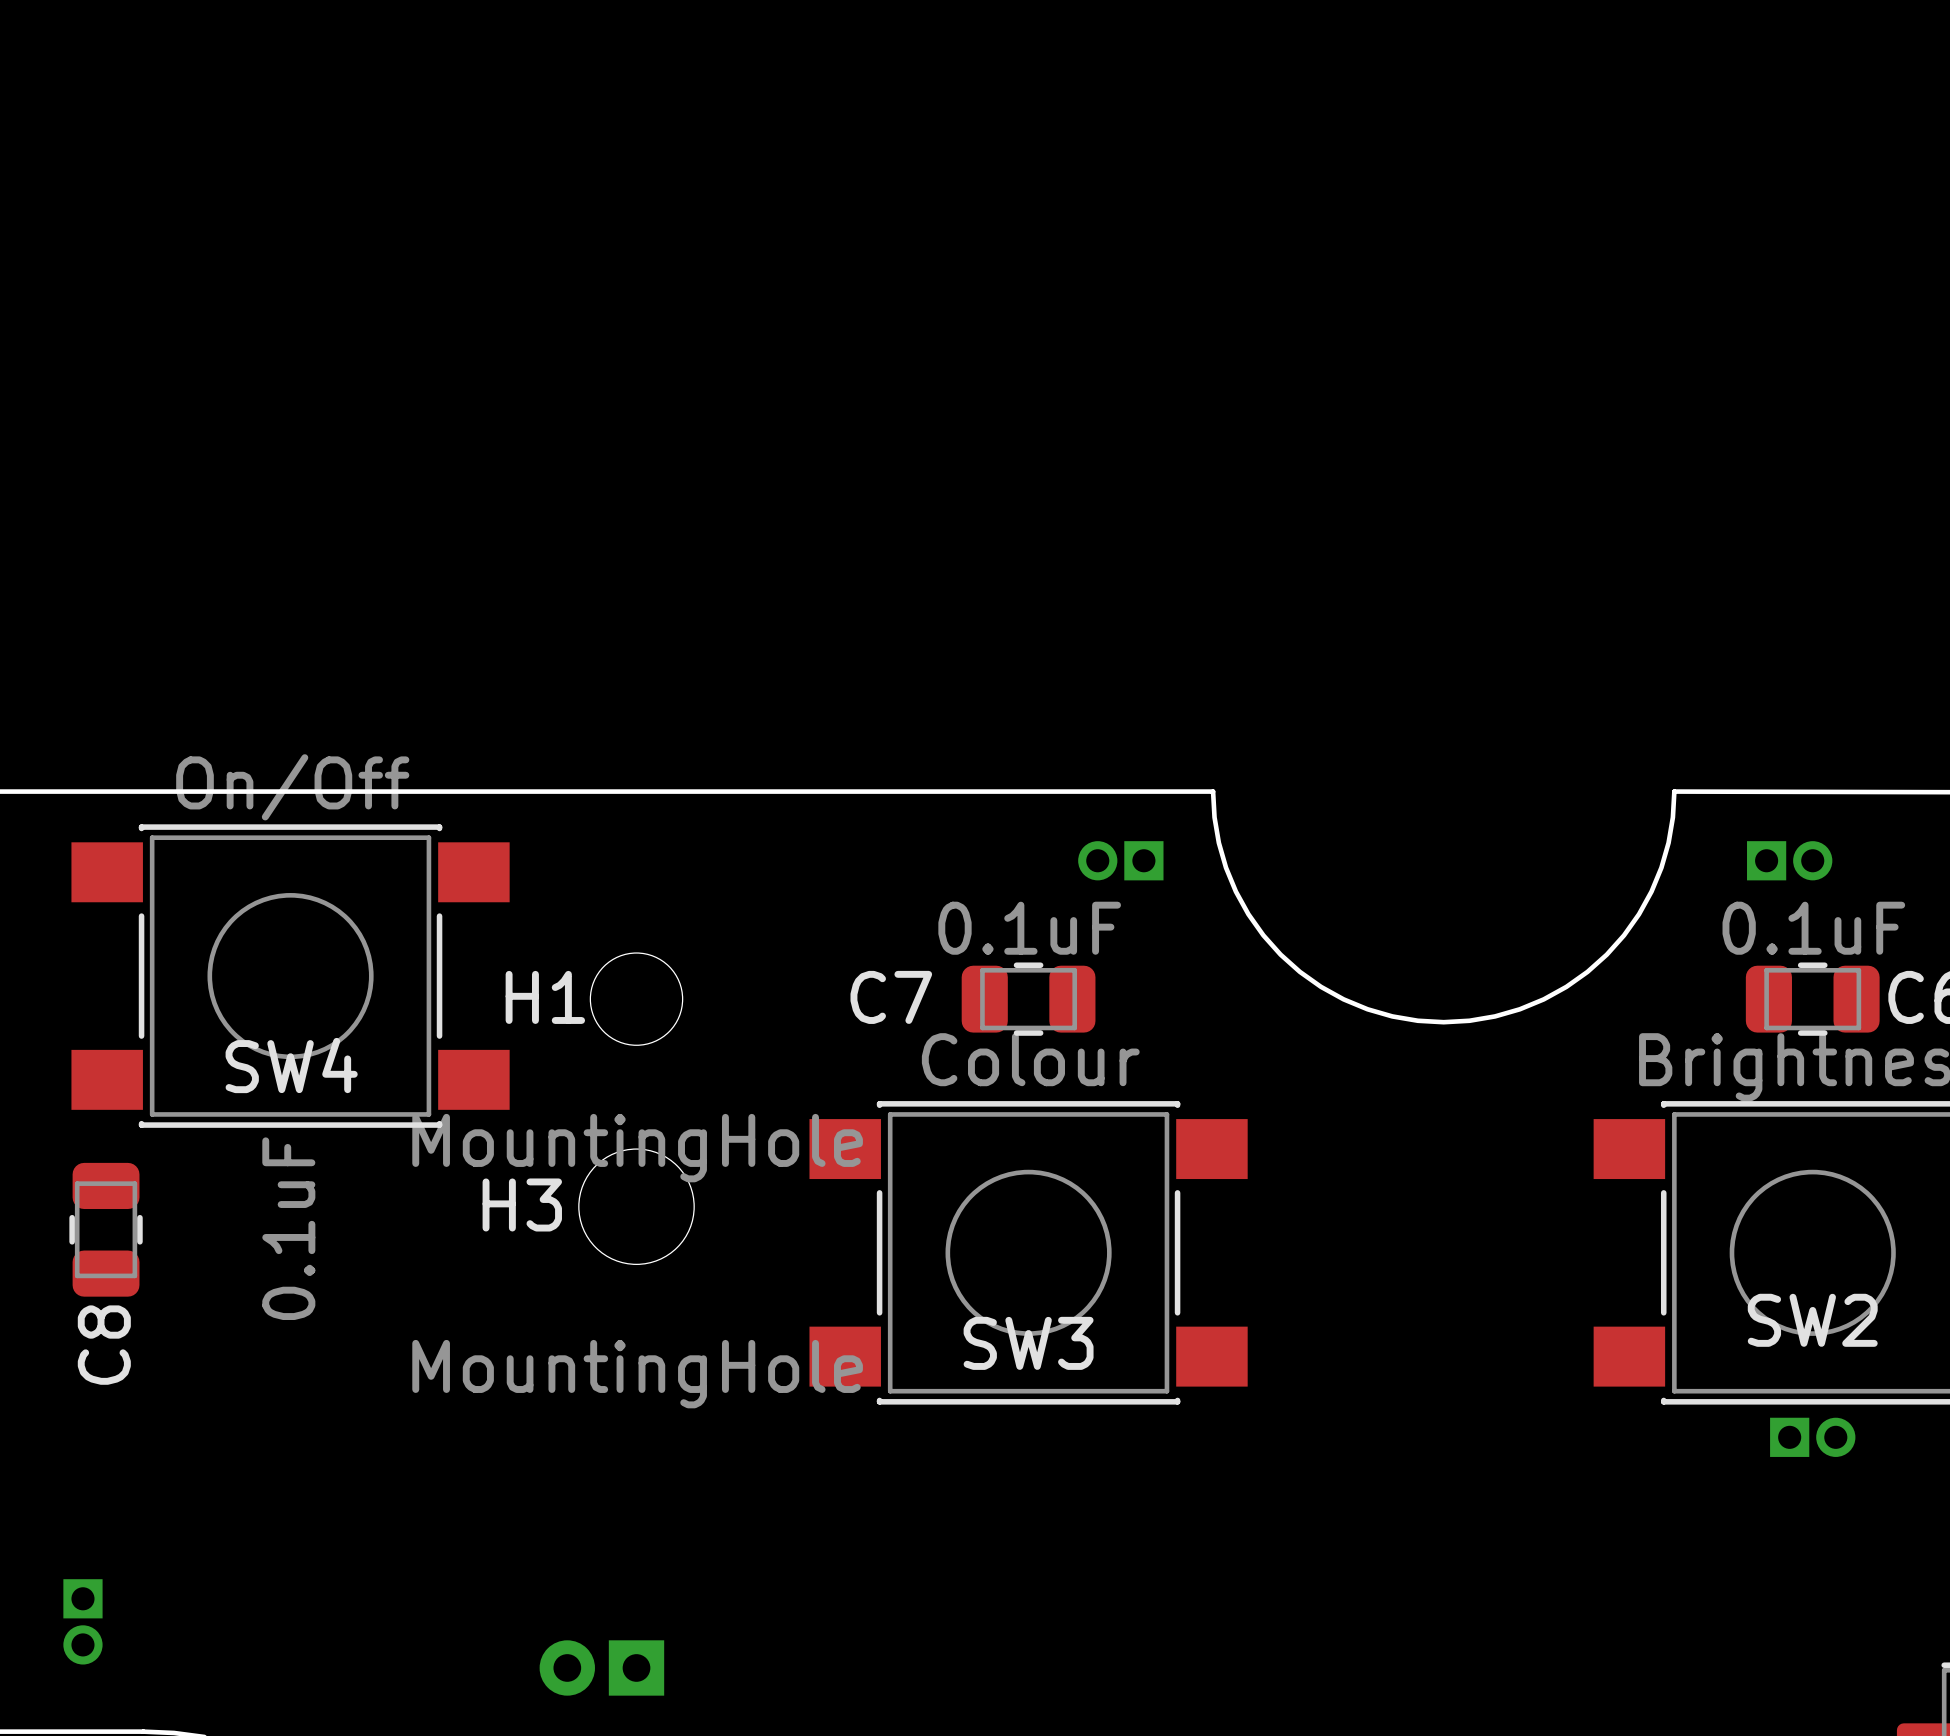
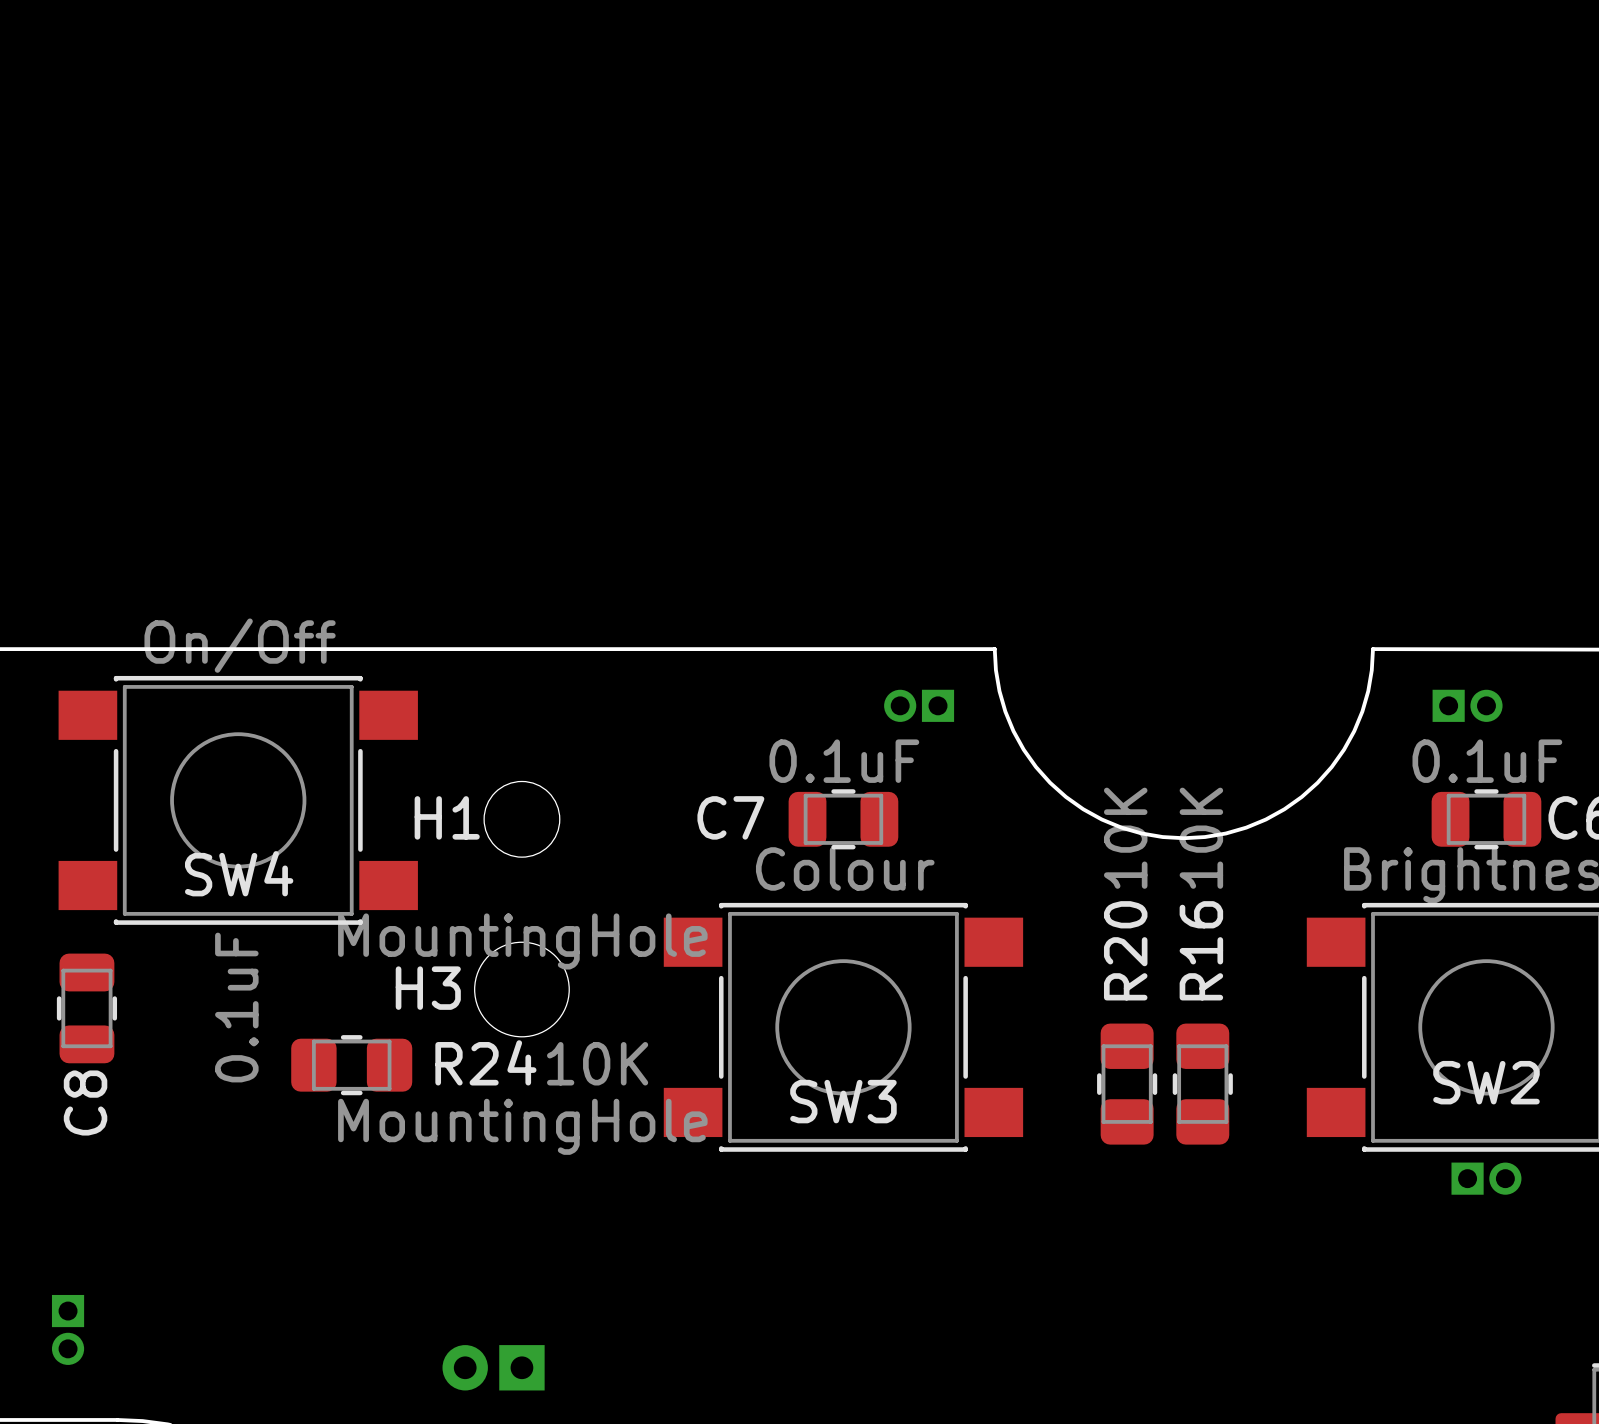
R24: none -> 10K (351, 1065)
R20: none -> 10K (1127, 1084)
R16: none -> 10K (1202, 1084)

